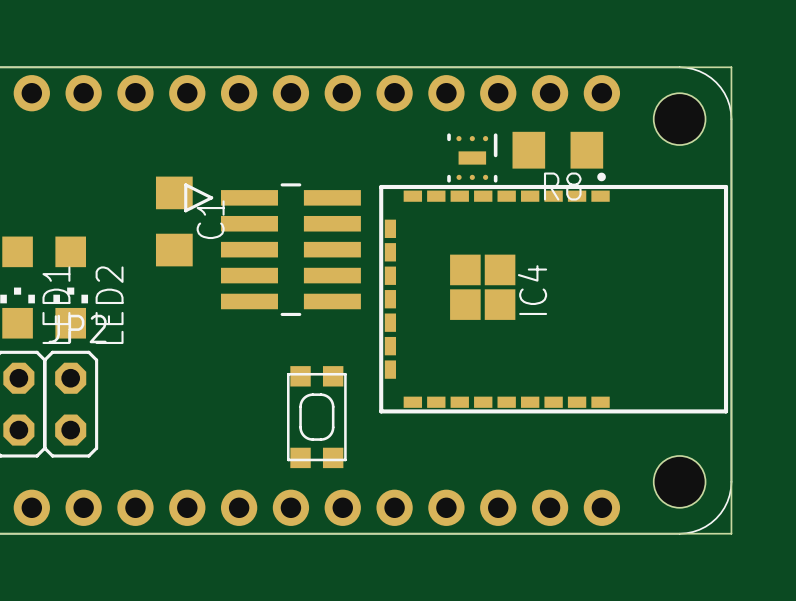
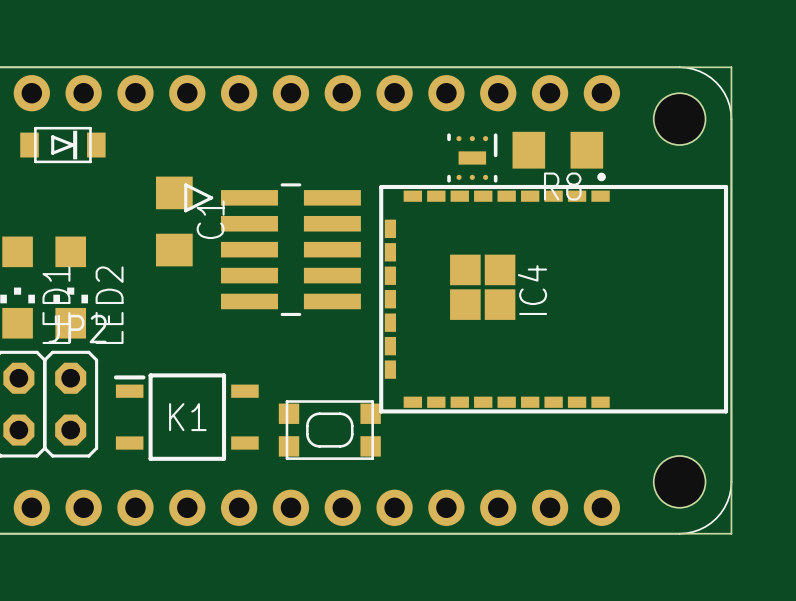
part: none -> (62, 145)
K1: none -> (186, 417)
part rotation: 0° (316, 417) -> 90° clockwise (329, 430)

